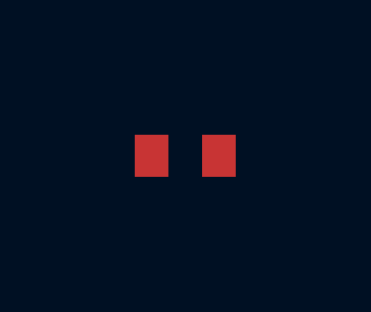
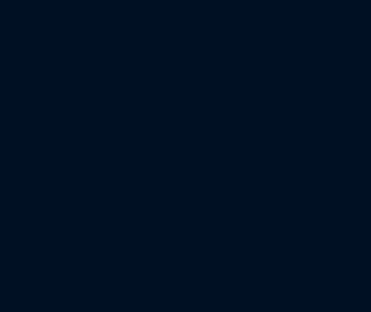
part: (185, 155) -> none

